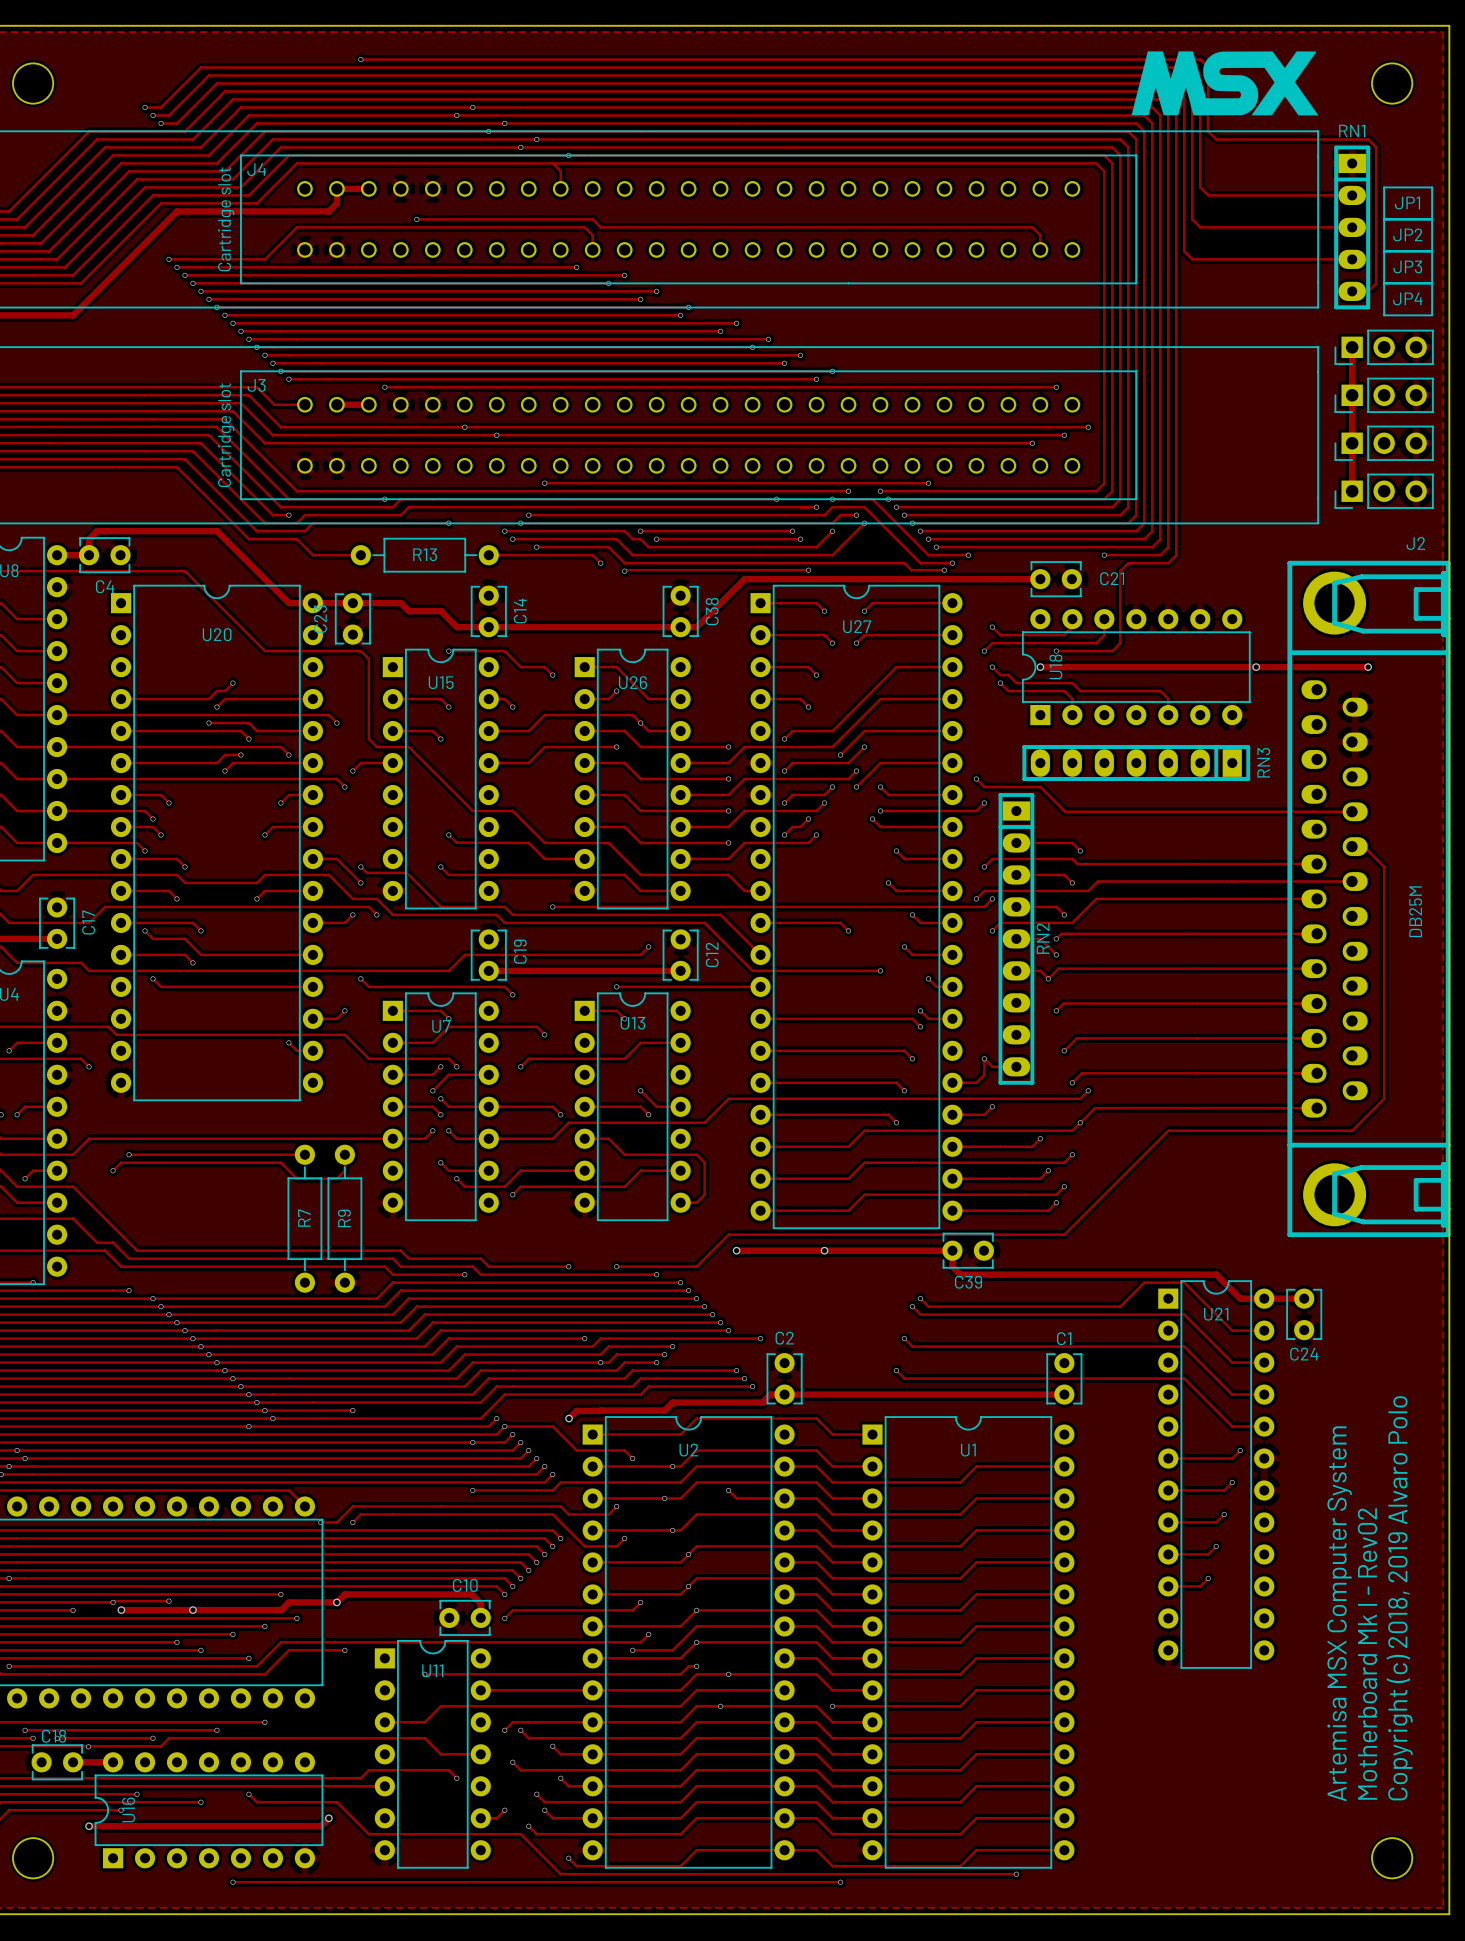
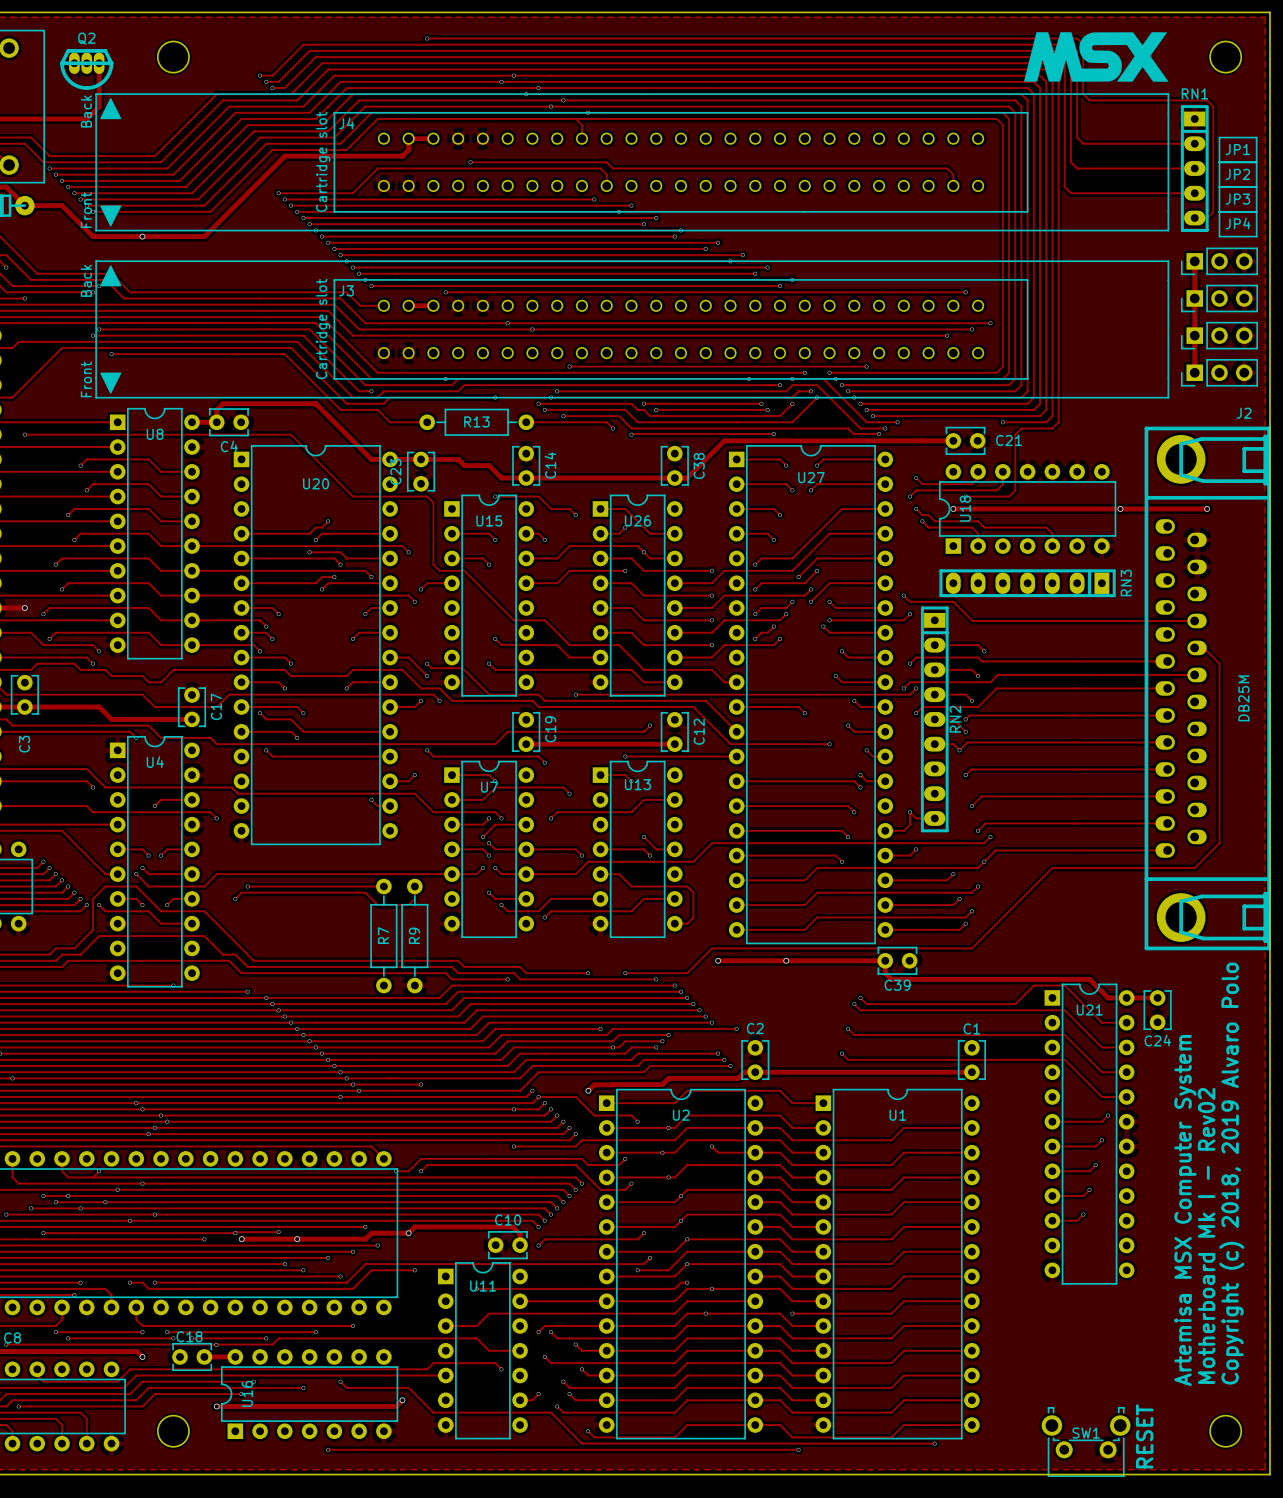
text: none -> RESET (1144, 1436)
SW1: none -> (1086, 1441)

